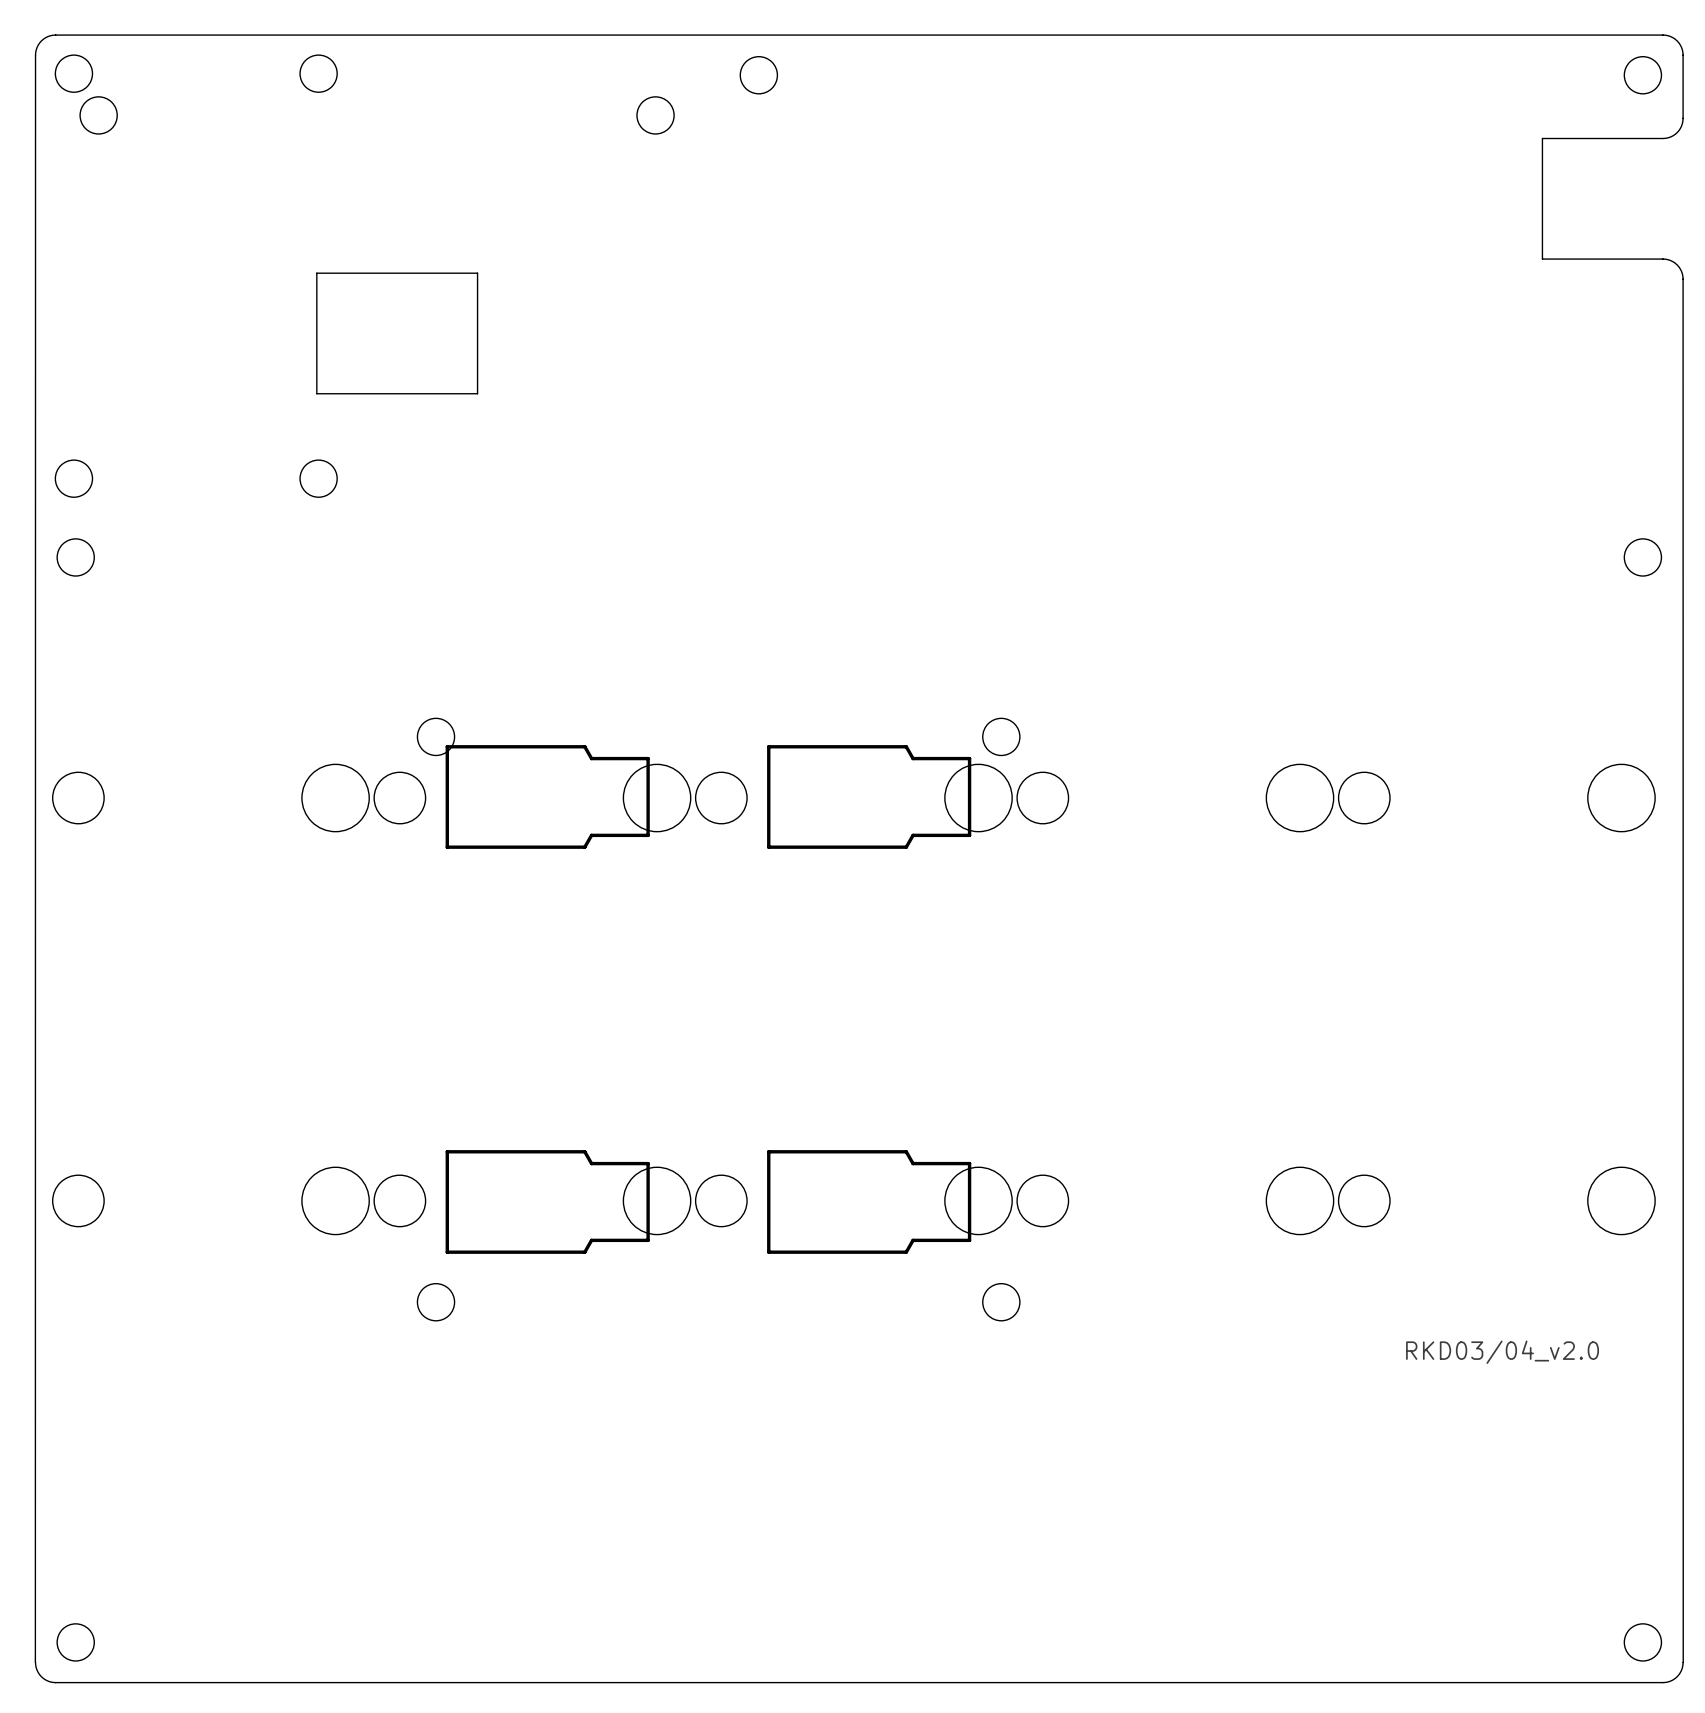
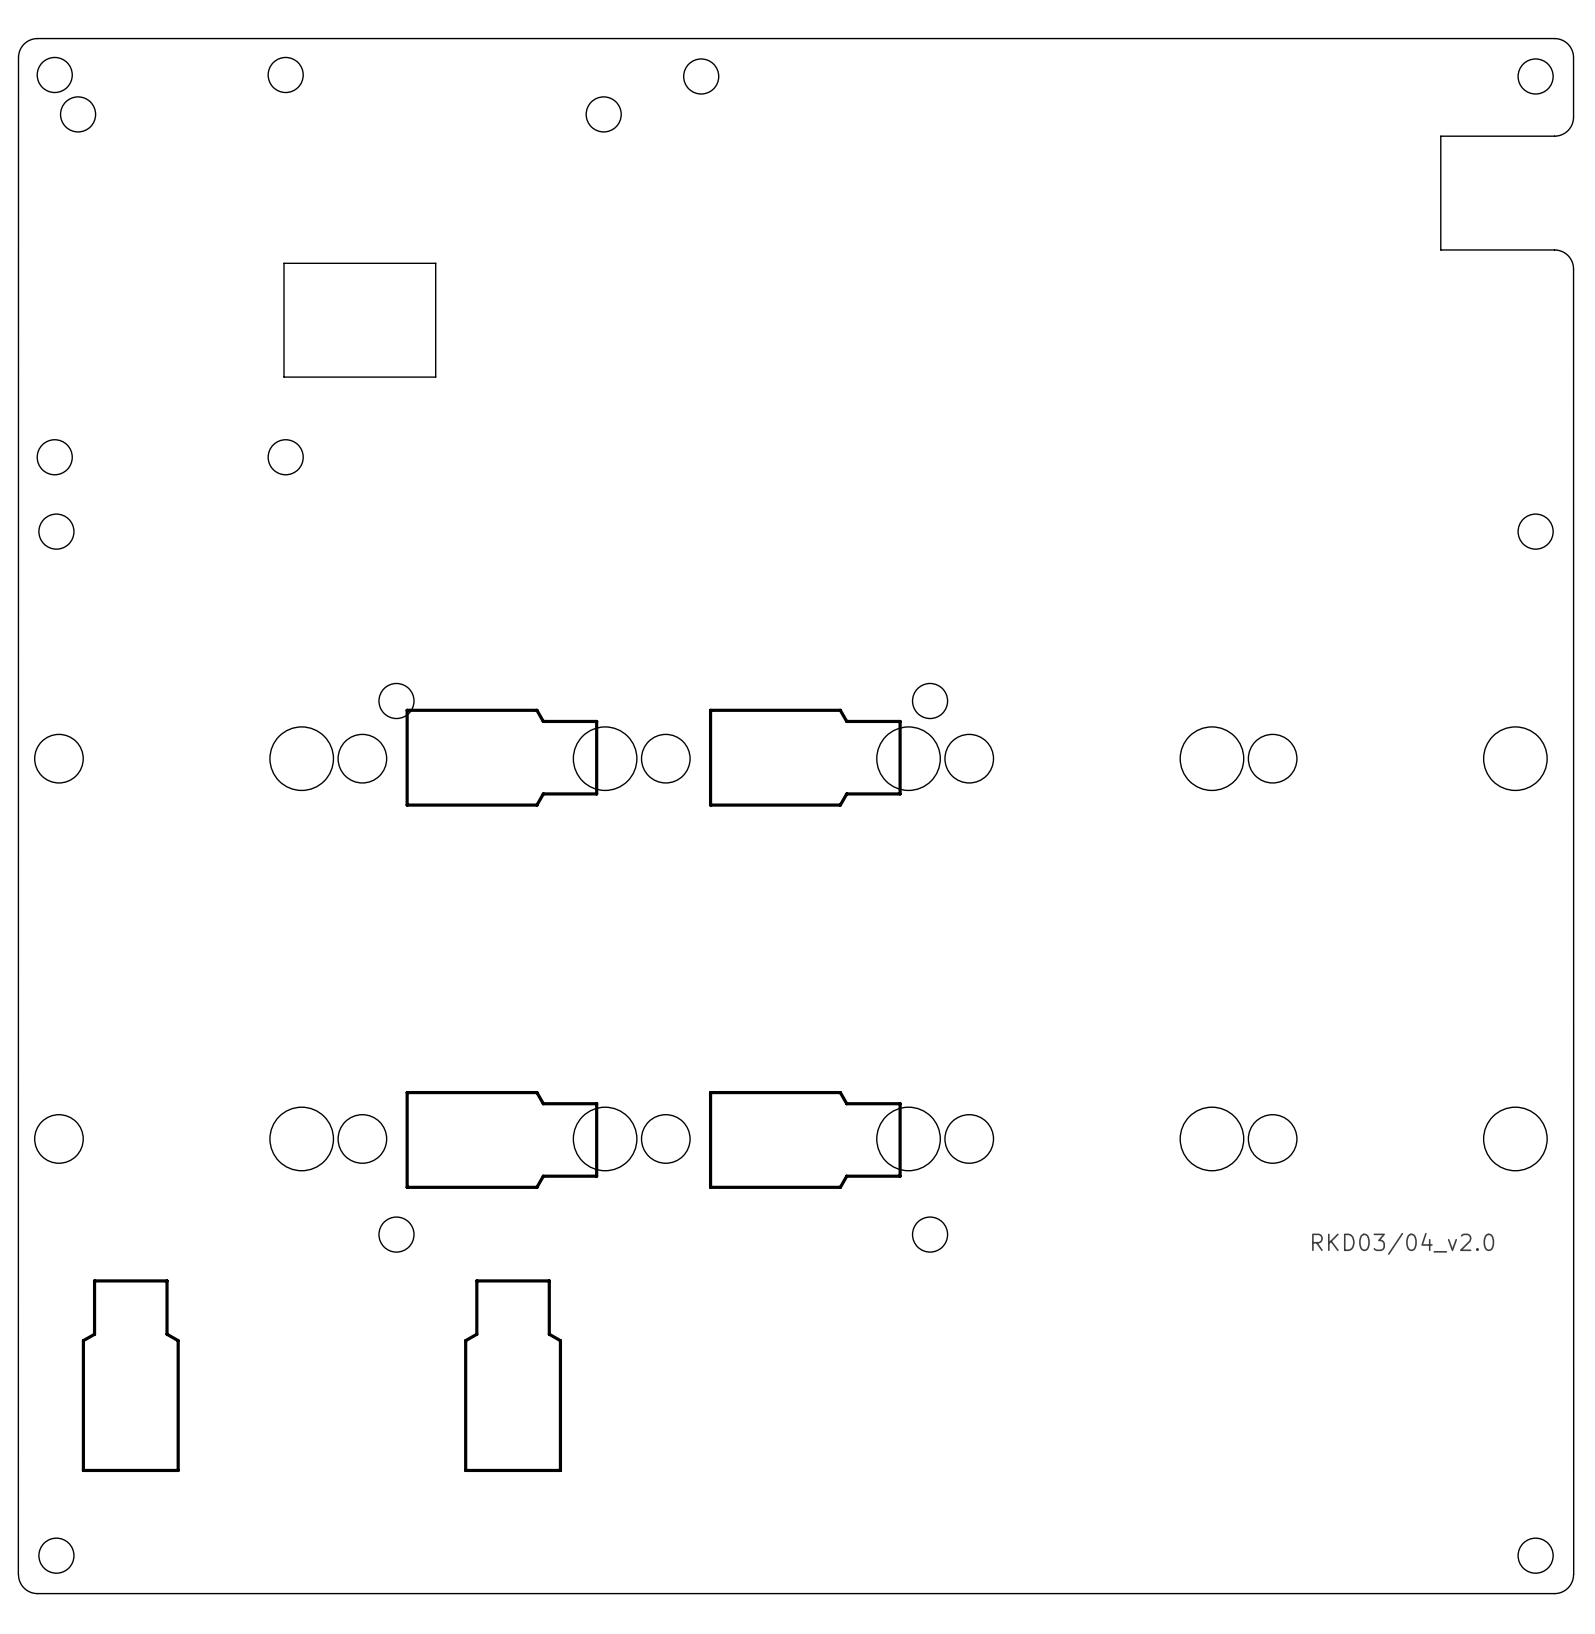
drawing: none -> [81, 1279, 563, 1473]
text position: RKD03/04_v2.0 (1502, 1352) -> RKD03/04_v2.0 (1403, 1243)

